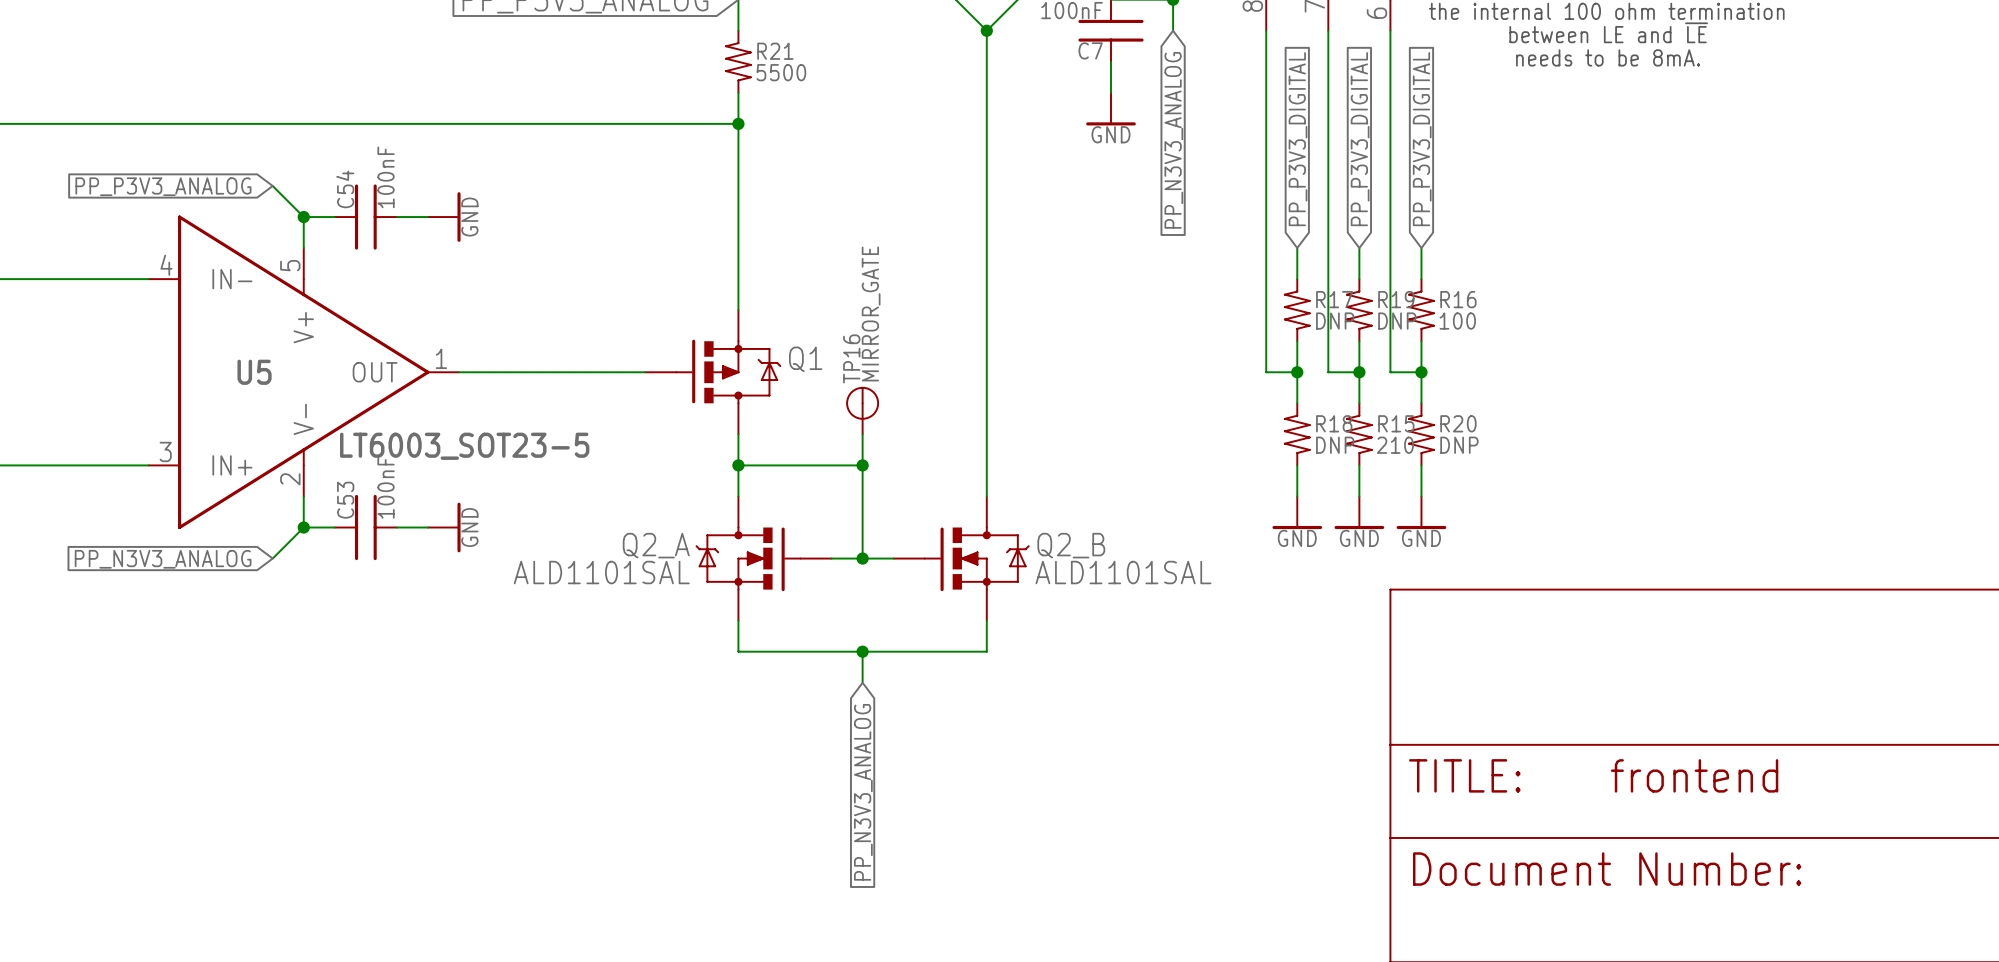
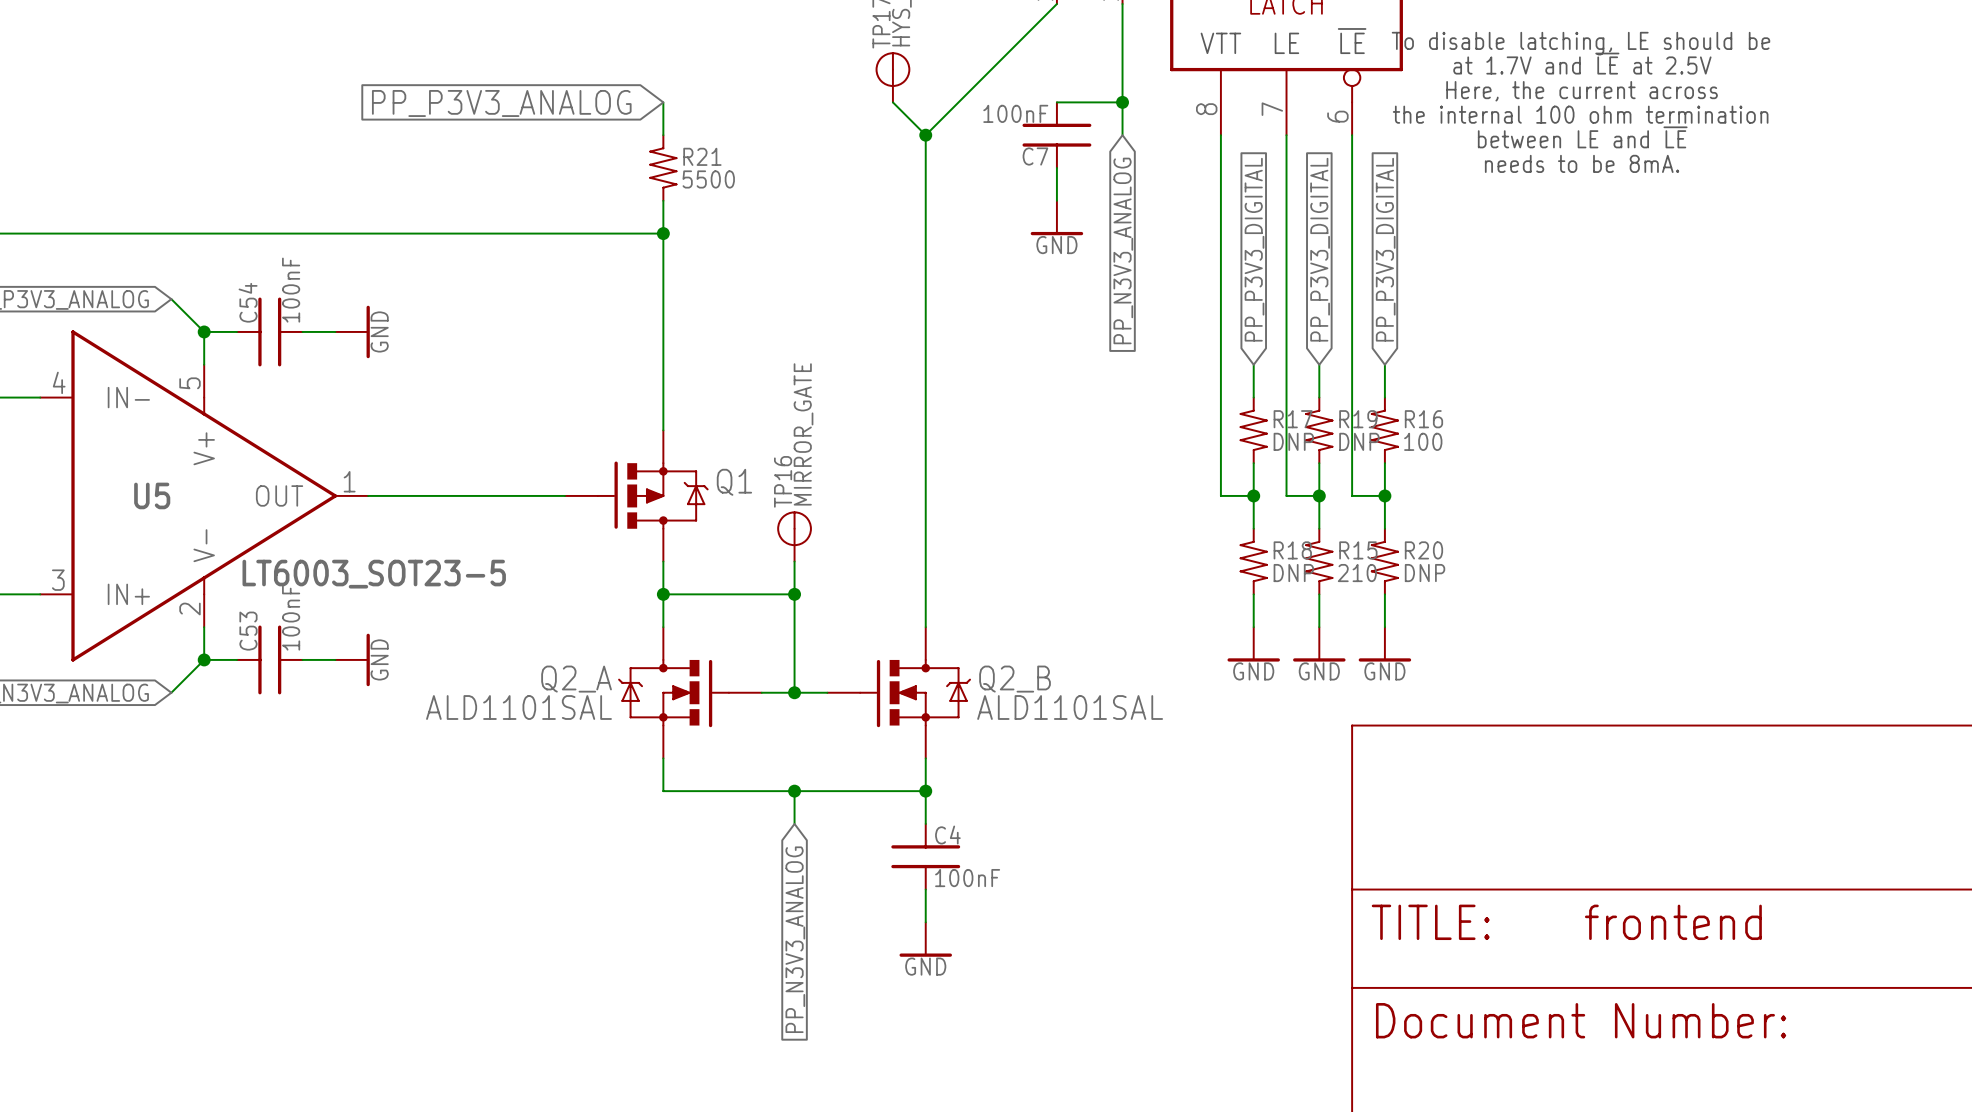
wire: none -> (925, 791) (925, 823)
junction: none -> (925, 791)
C4: none -> 100nF (925, 856)
wire: none -> (925, 889) (925, 922)
power symbol: none -> GND (925, 939)

